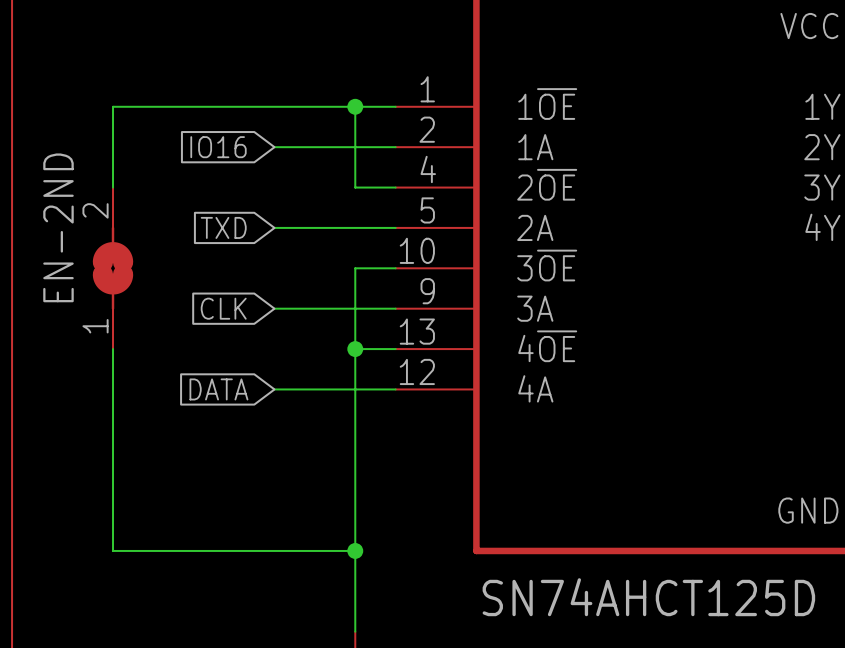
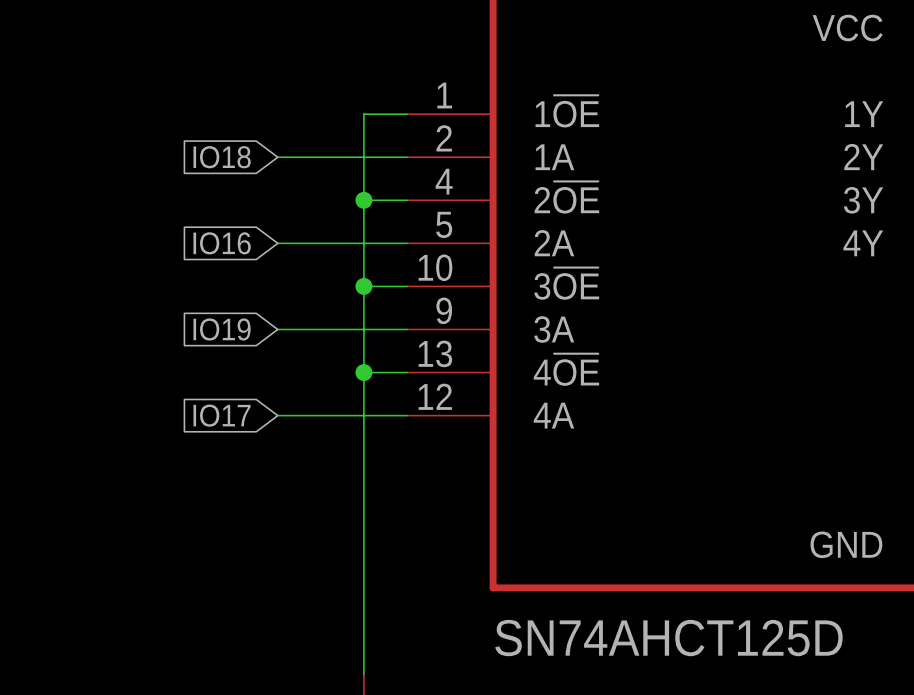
wire: (355, 106) (113, 106) (113, 187) -> none
junction: (355, 106) -> none
global label: IO16 (218, 147) -> IO18 (222, 157)
wire: none -> (363, 200) (363, 286)
junction: none -> (363, 200)
global label: TXD (223, 227) -> IO16 (222, 243)
EN-2ND: (113, 268) -> none
junction: none -> (363, 286)
global label: CLK (223, 308) -> IO19 (222, 329)
wire: (113, 349) (113, 550) (355, 550) -> none
global label: DATA (218, 389) -> IO17 (222, 415)
junction: (355, 550) -> none

